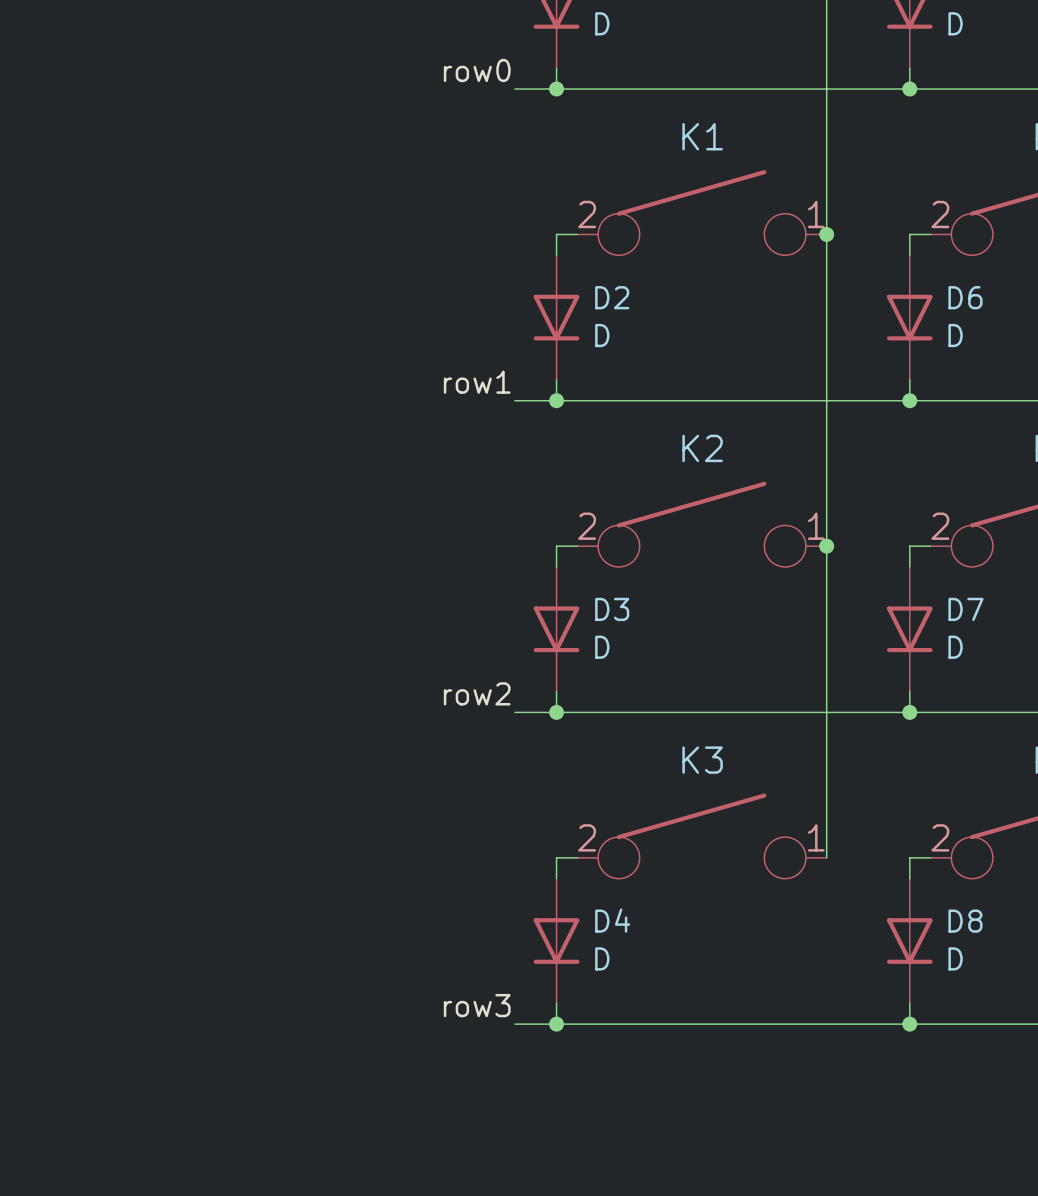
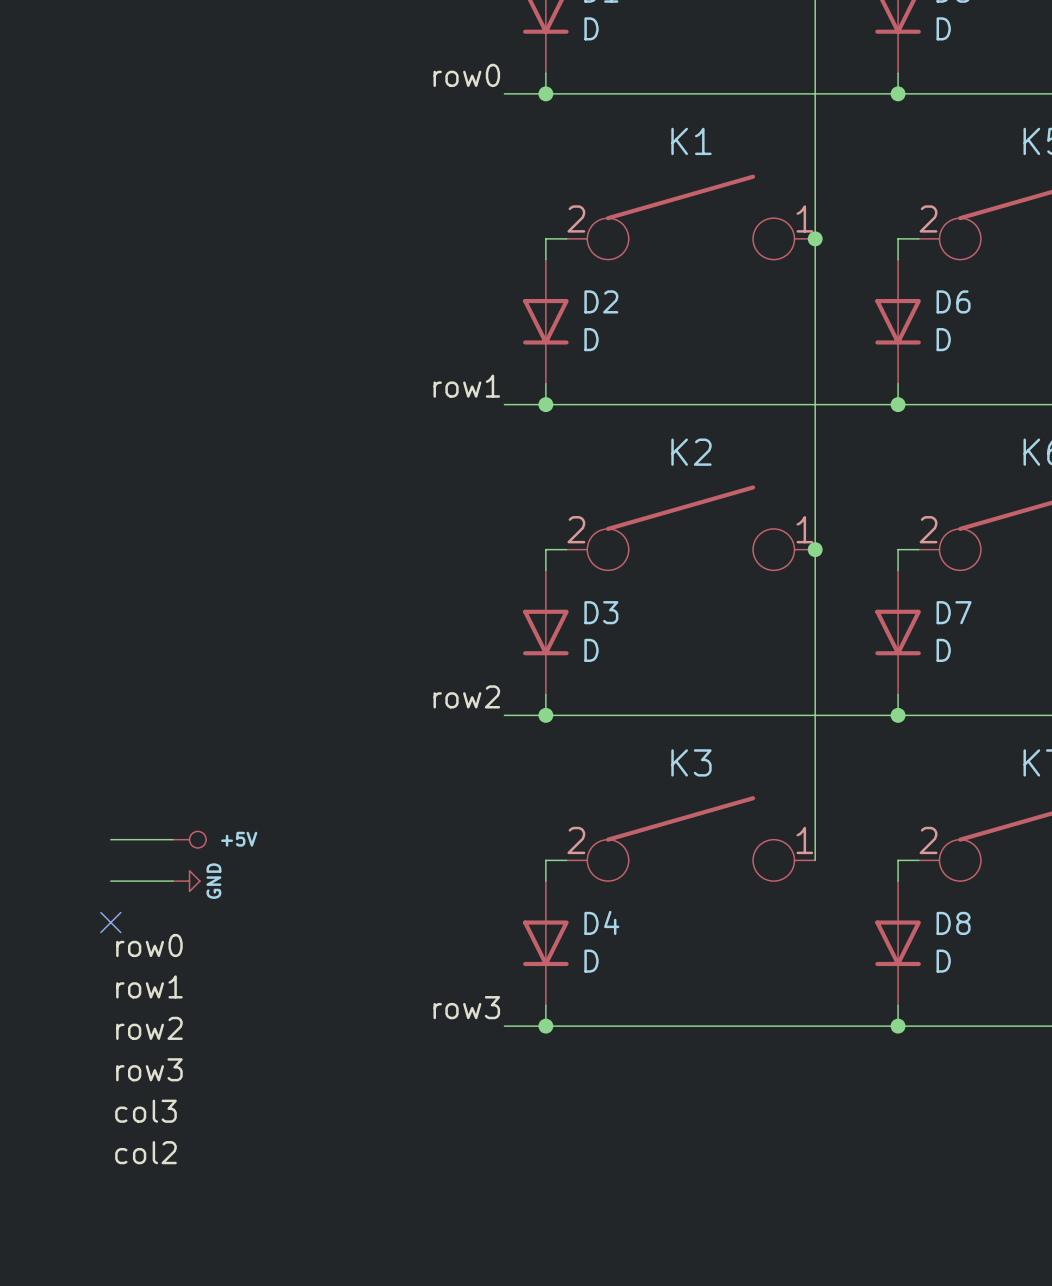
wire: none -> (110, 839) (172, 839)
power symbol: none -> +5V (189, 839)
wire: none -> (110, 881) (172, 881)
power symbol: none -> GND (186, 881)
no-connect mark: none -> (110, 922)
label: none -> row0 (149, 945)
label: none -> row1 (149, 986)
label: none -> row2 (149, 1028)
label: none -> row3 (149, 1069)
label: none -> col3 (146, 1111)
label: none -> col2 (146, 1152)

